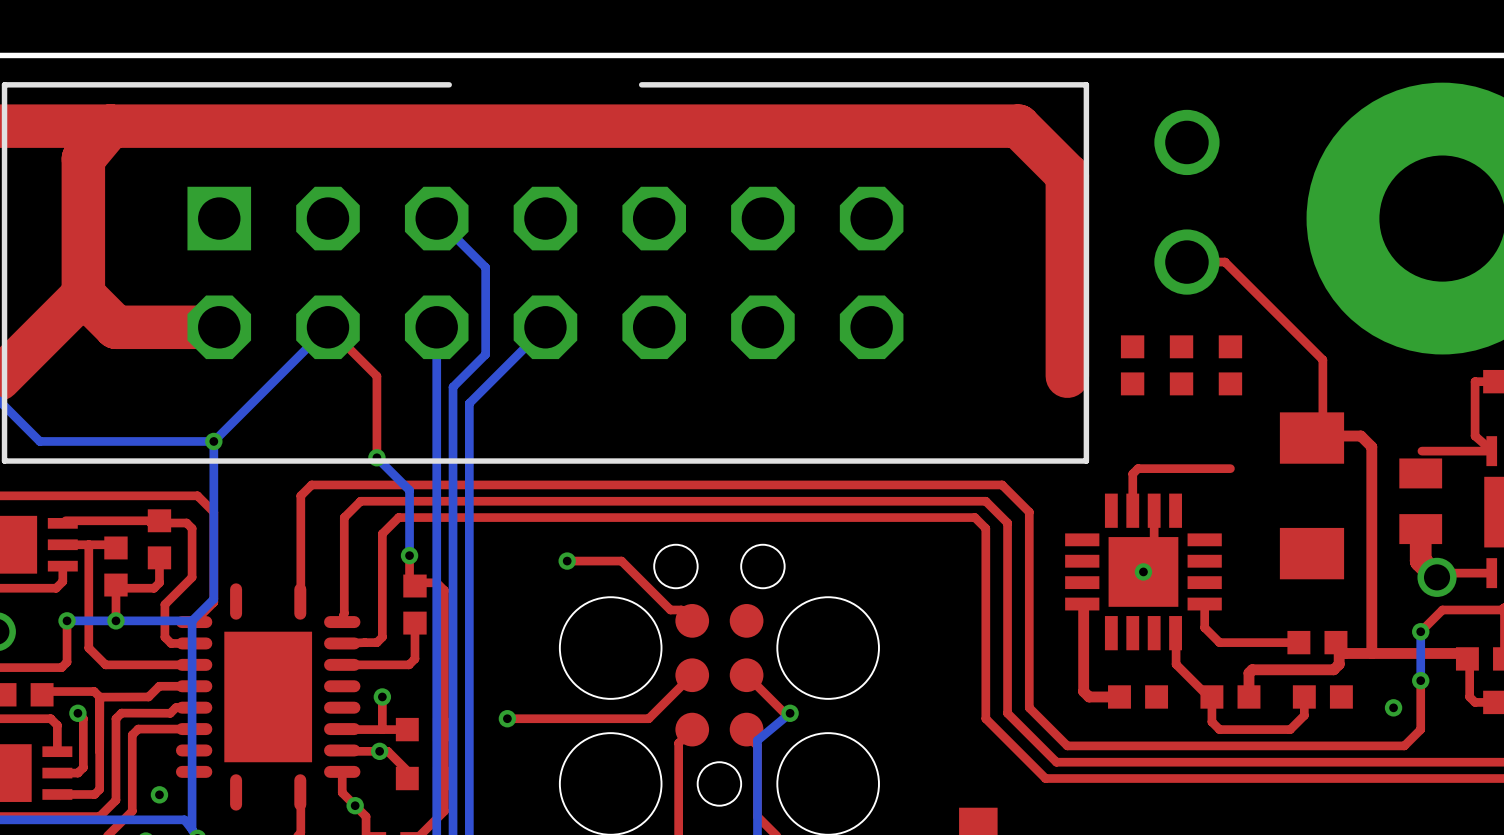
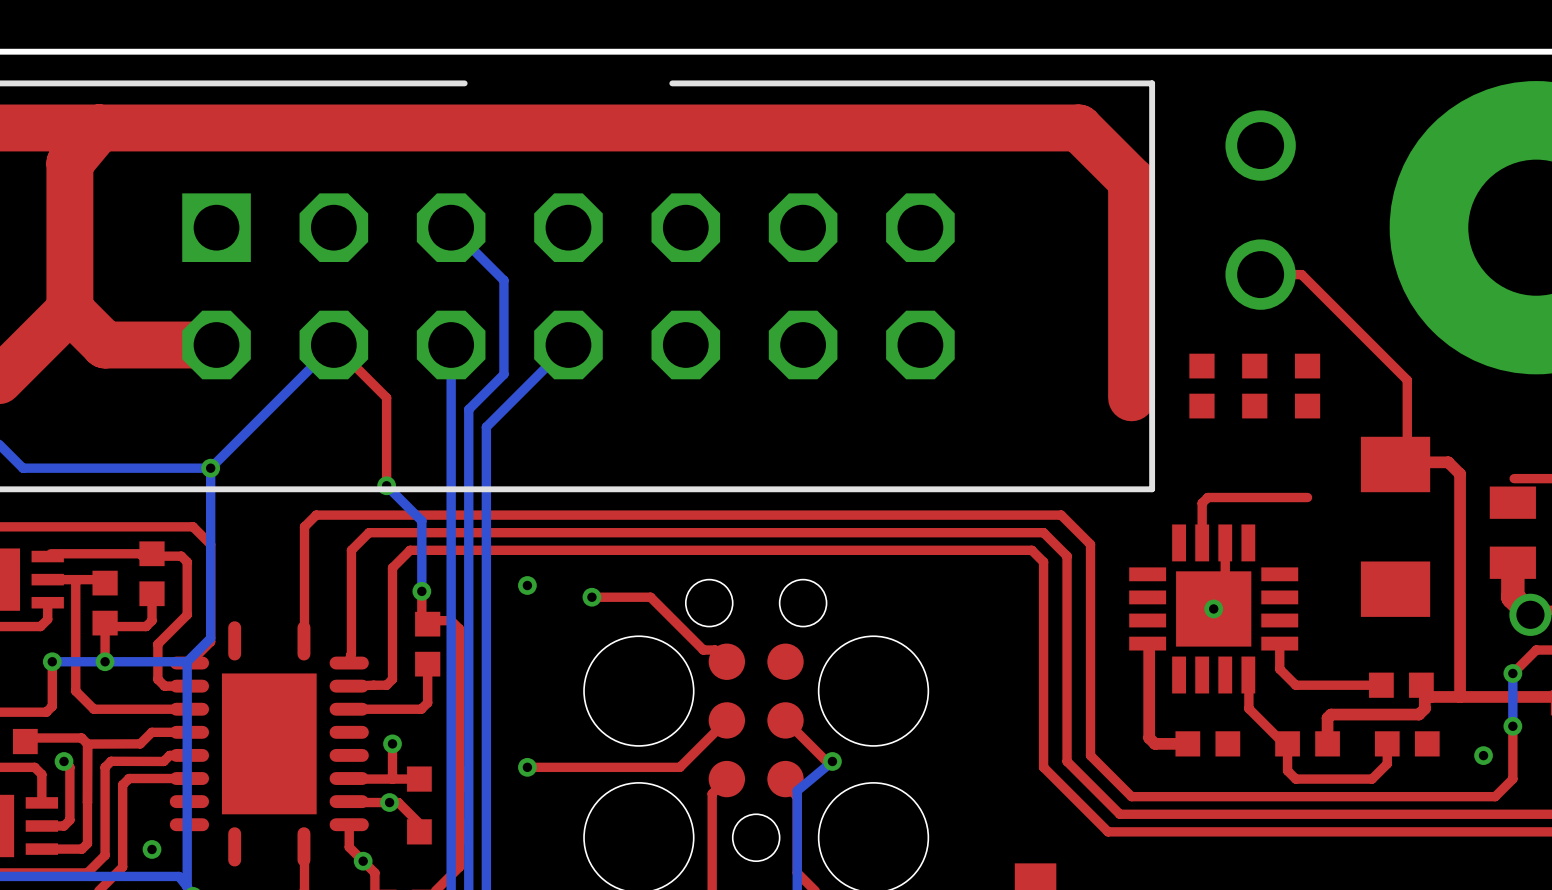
via: none -> (527, 585)

